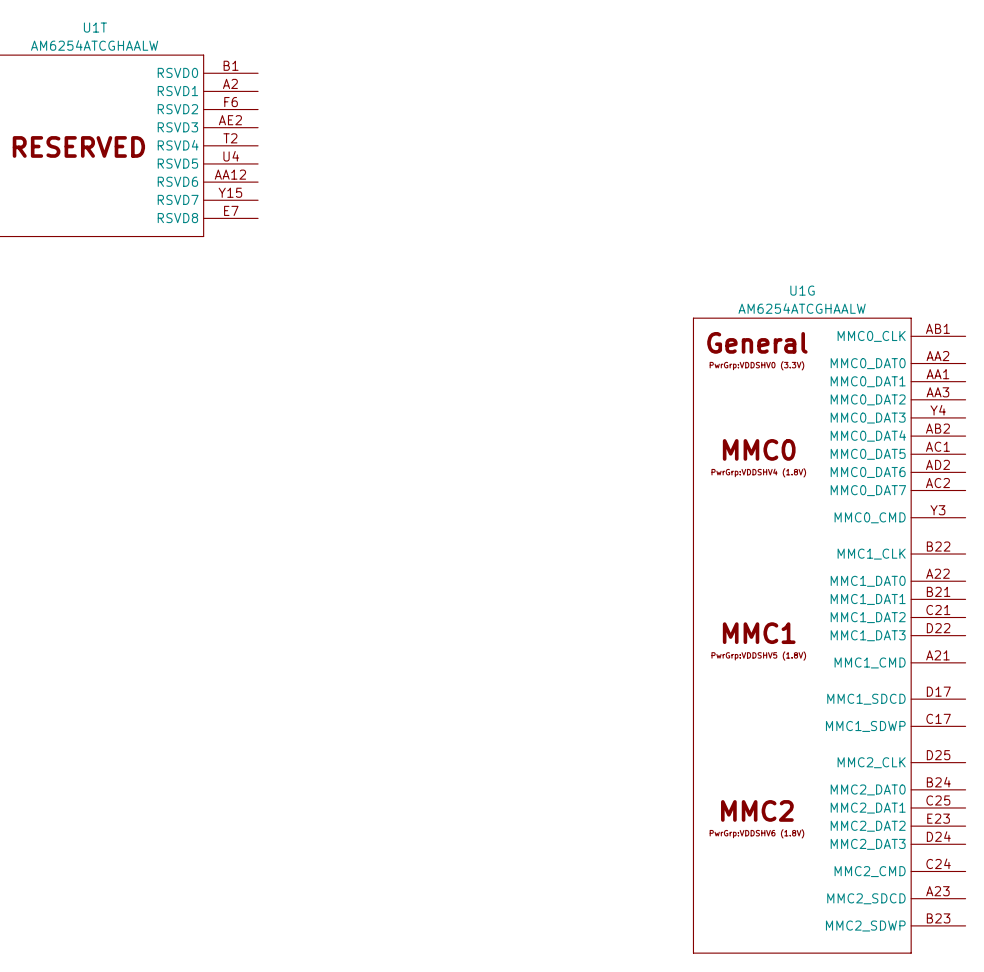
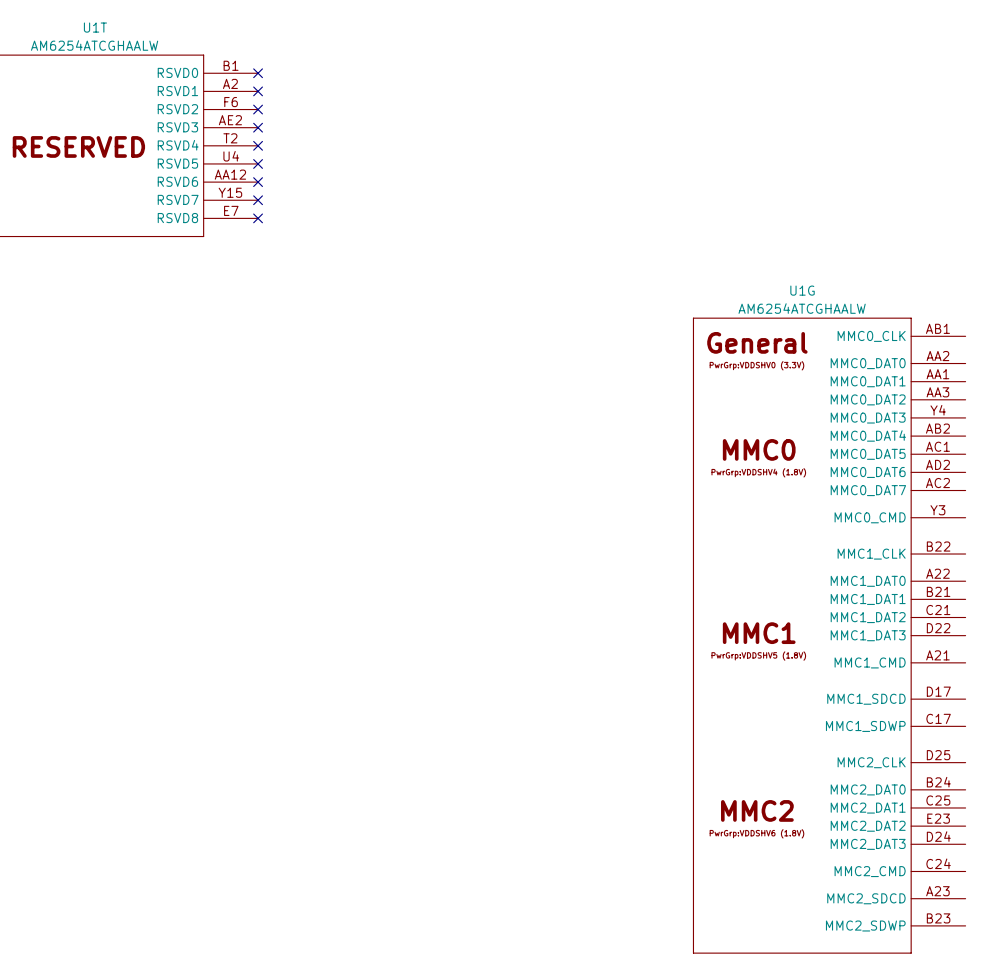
no-connect mark: none -> (258, 73)
no-connect mark: none -> (258, 91)
no-connect mark: none -> (258, 109)
no-connect mark: none -> (258, 127)
no-connect mark: none -> (258, 145)
no-connect mark: none -> (258, 163)
no-connect mark: none -> (258, 182)
no-connect mark: none -> (258, 200)
no-connect mark: none -> (258, 218)

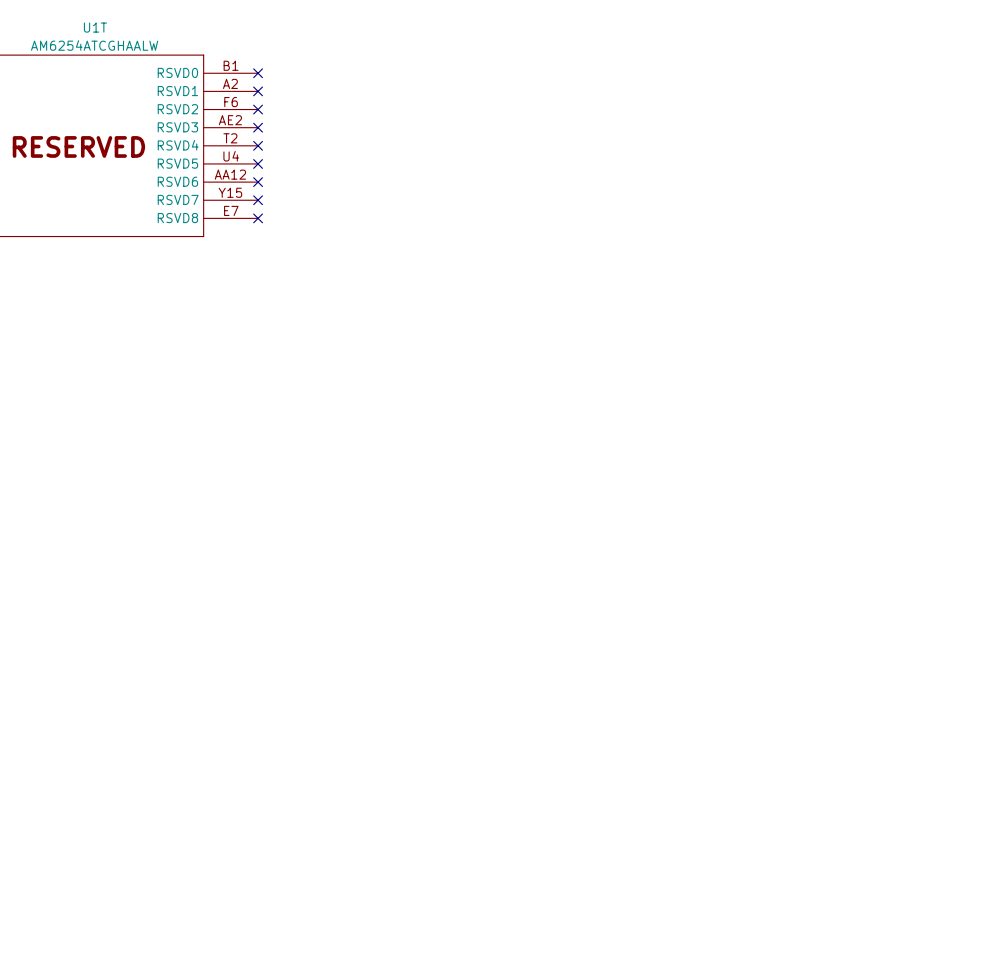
U1G: AM6254ATCGHAALW (829, 635) -> none

